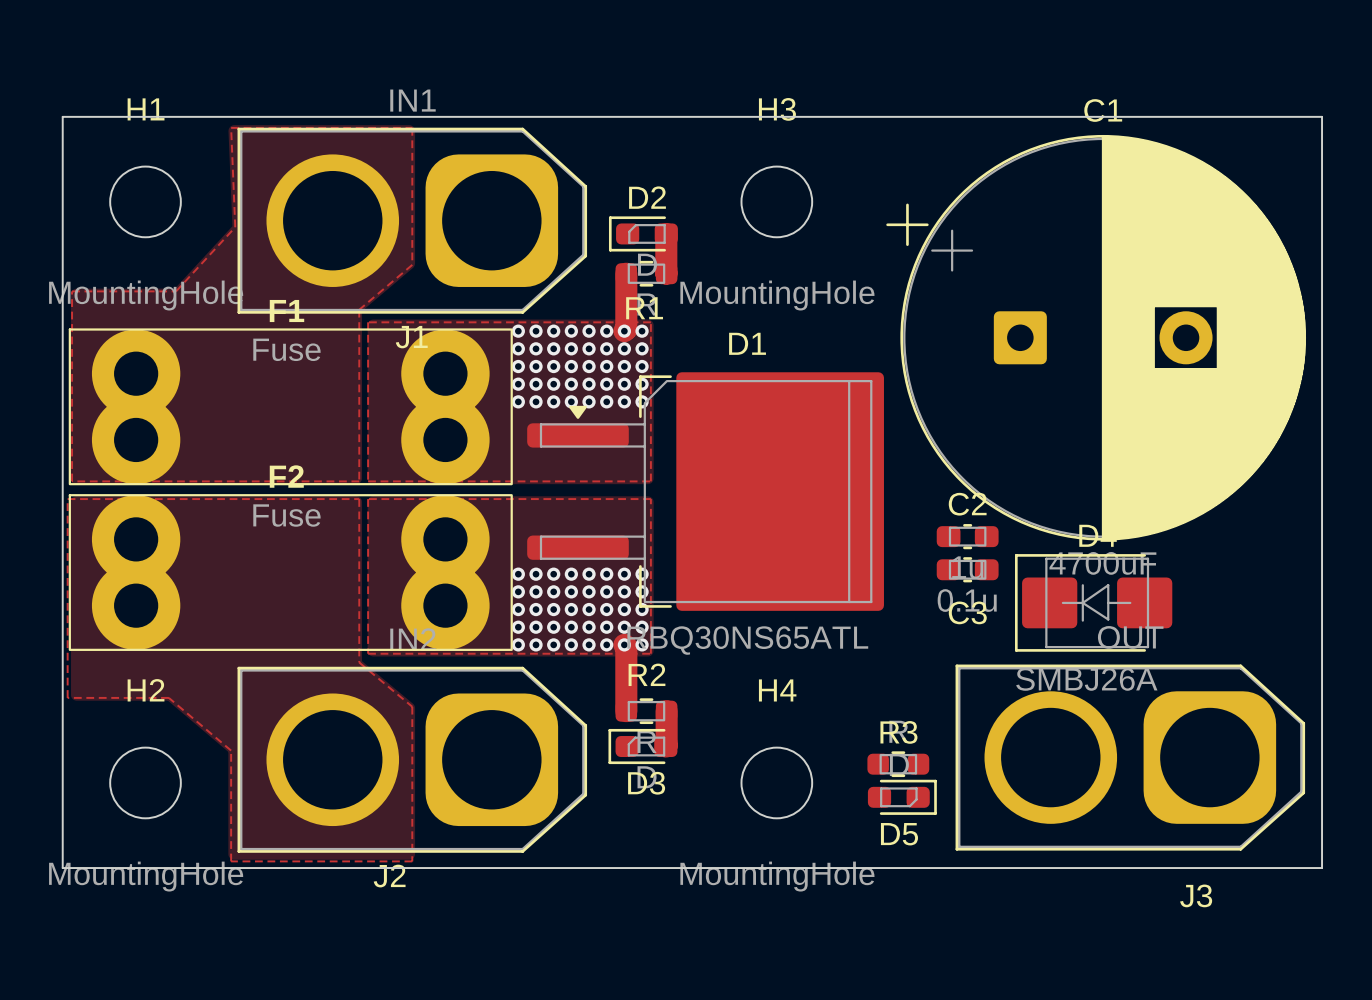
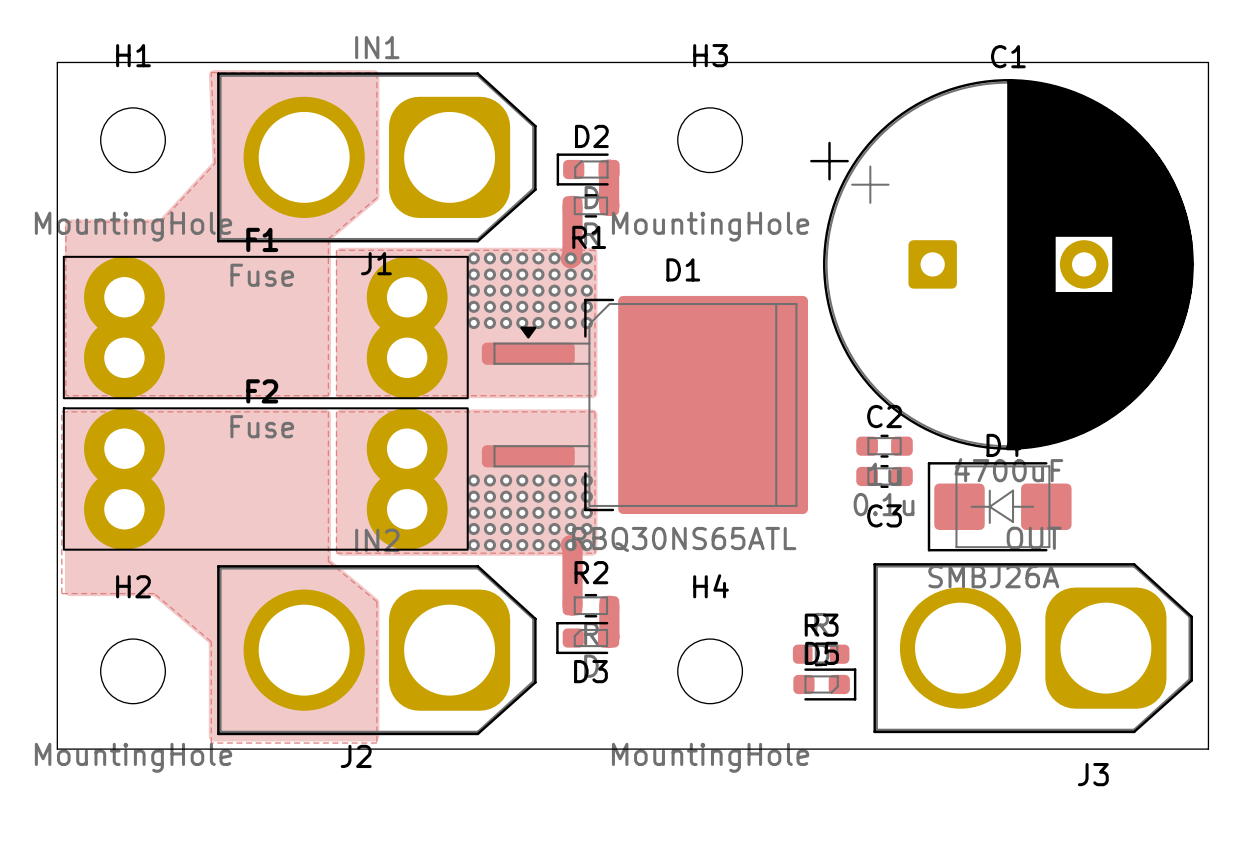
D5 name position: D5 (899, 834) -> D5 (822, 653)

